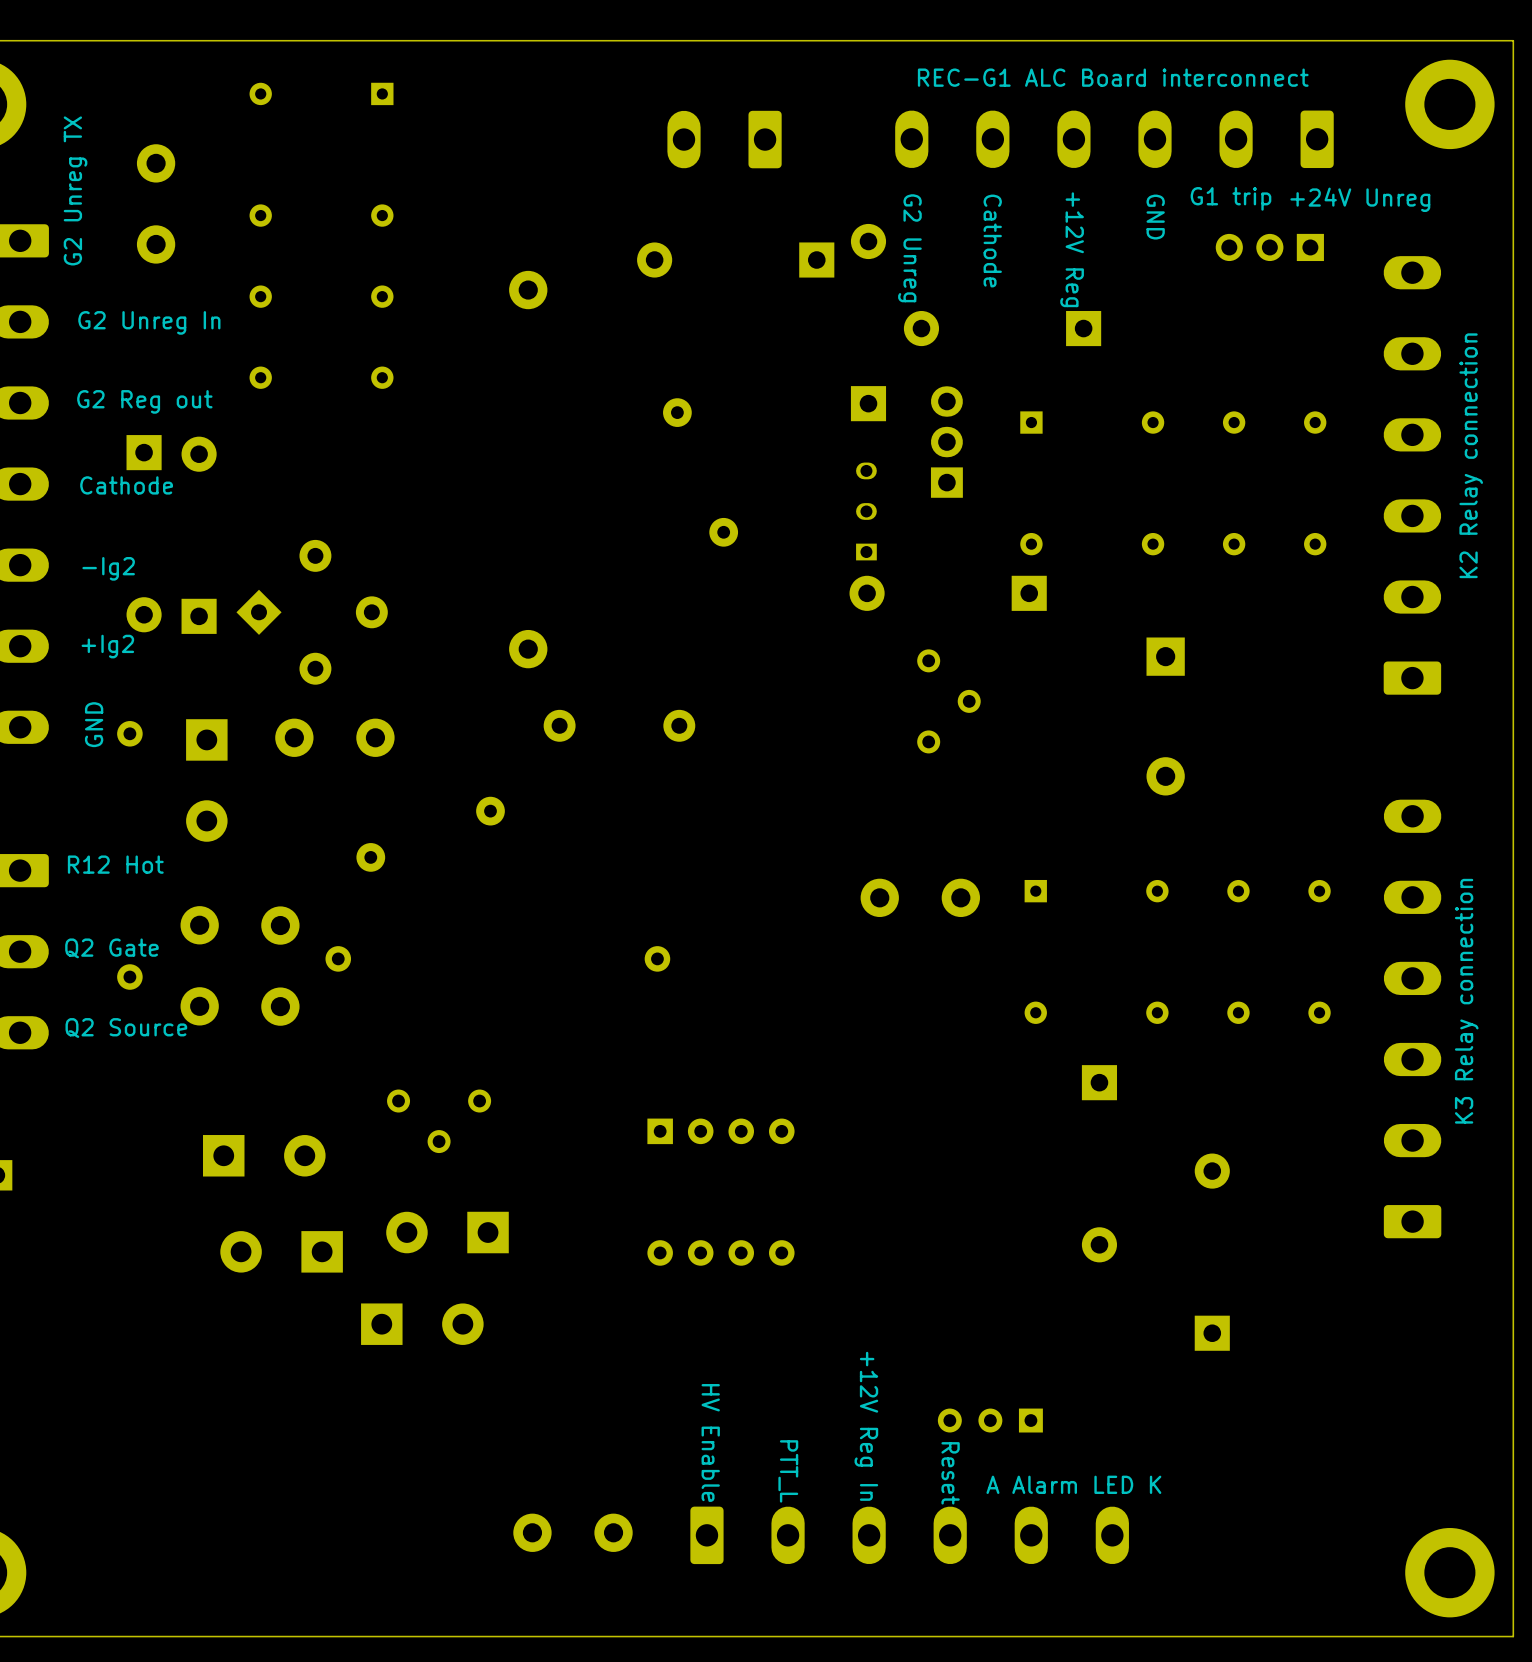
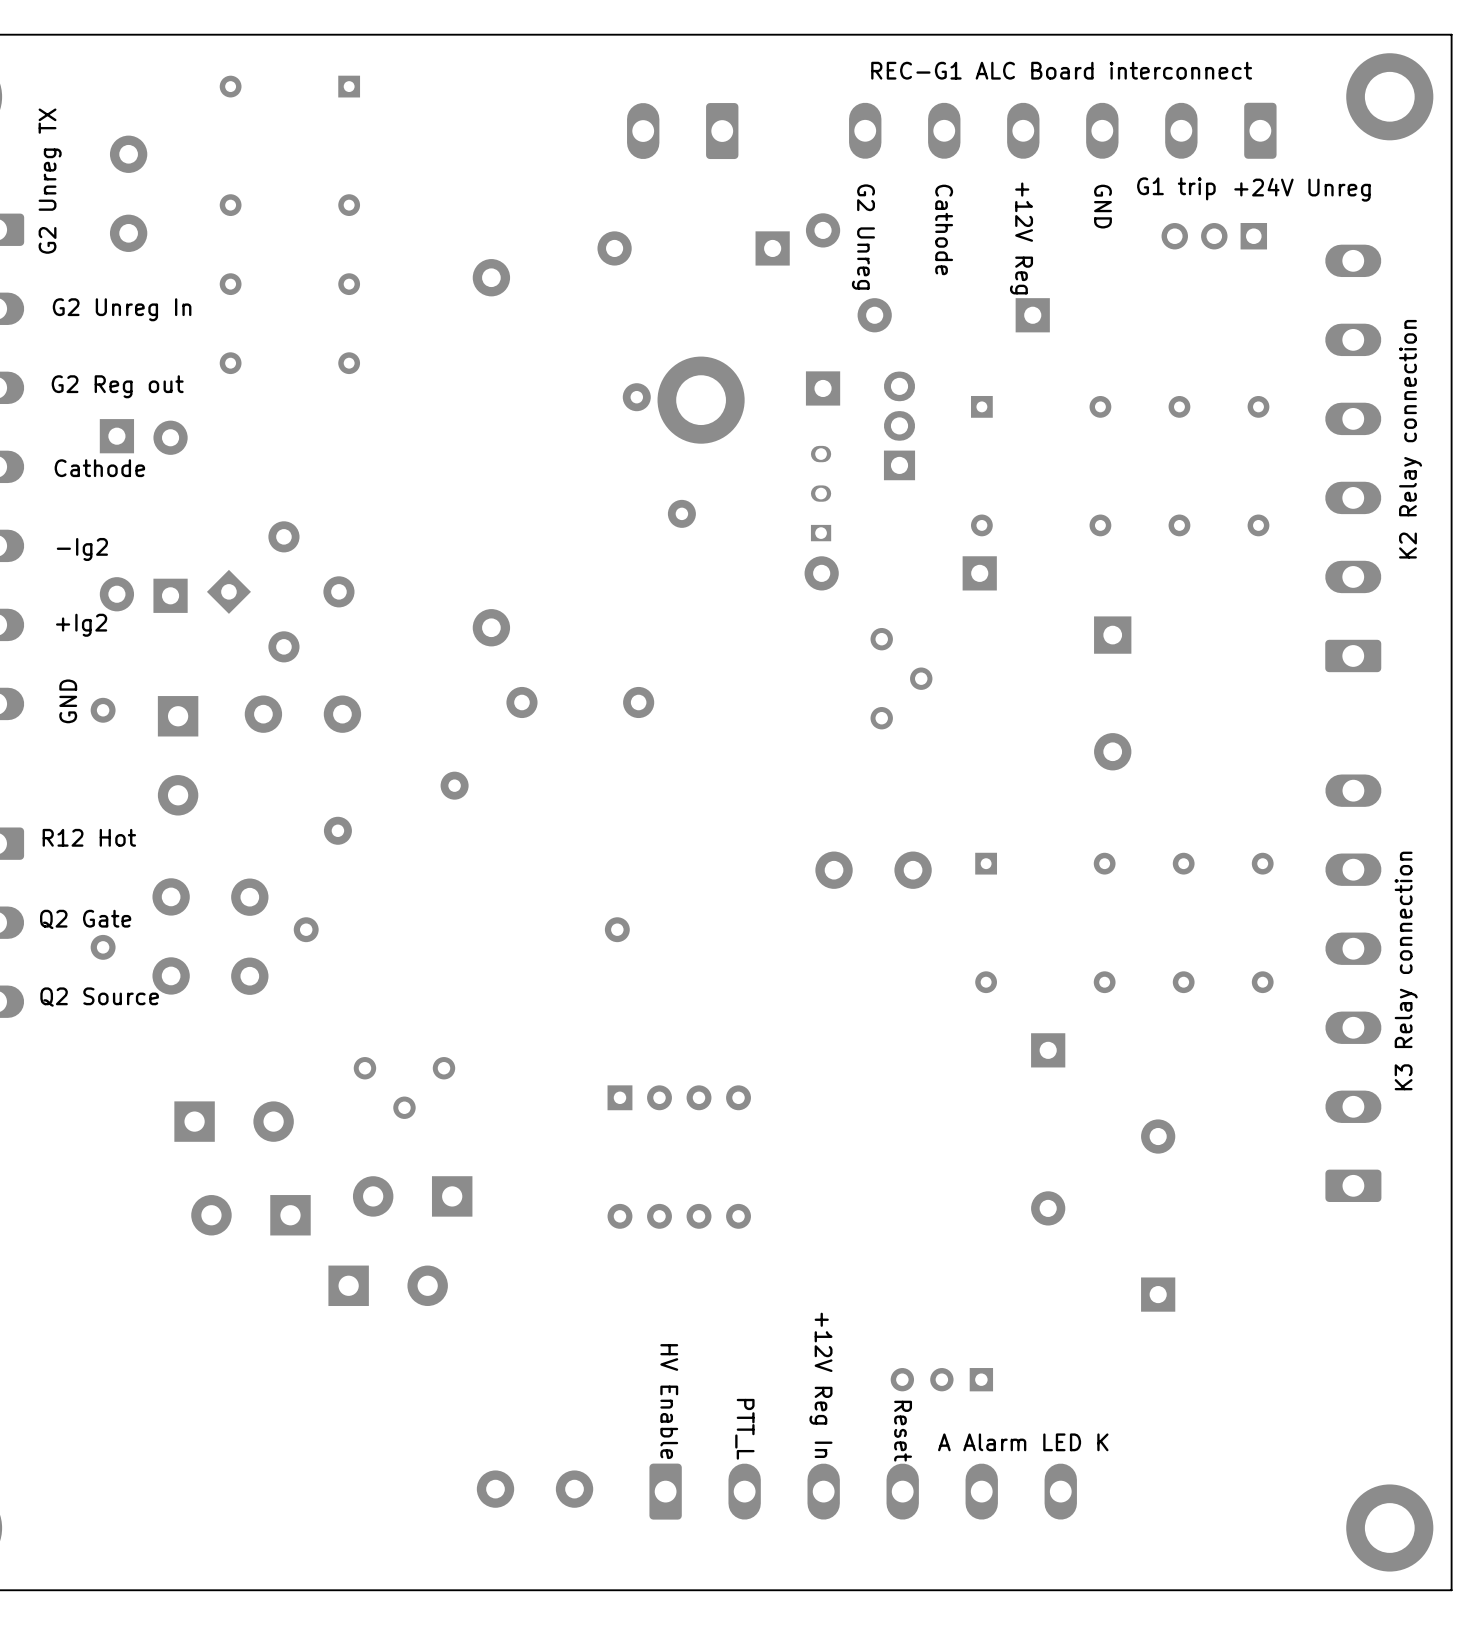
part: none -> (701, 400)

